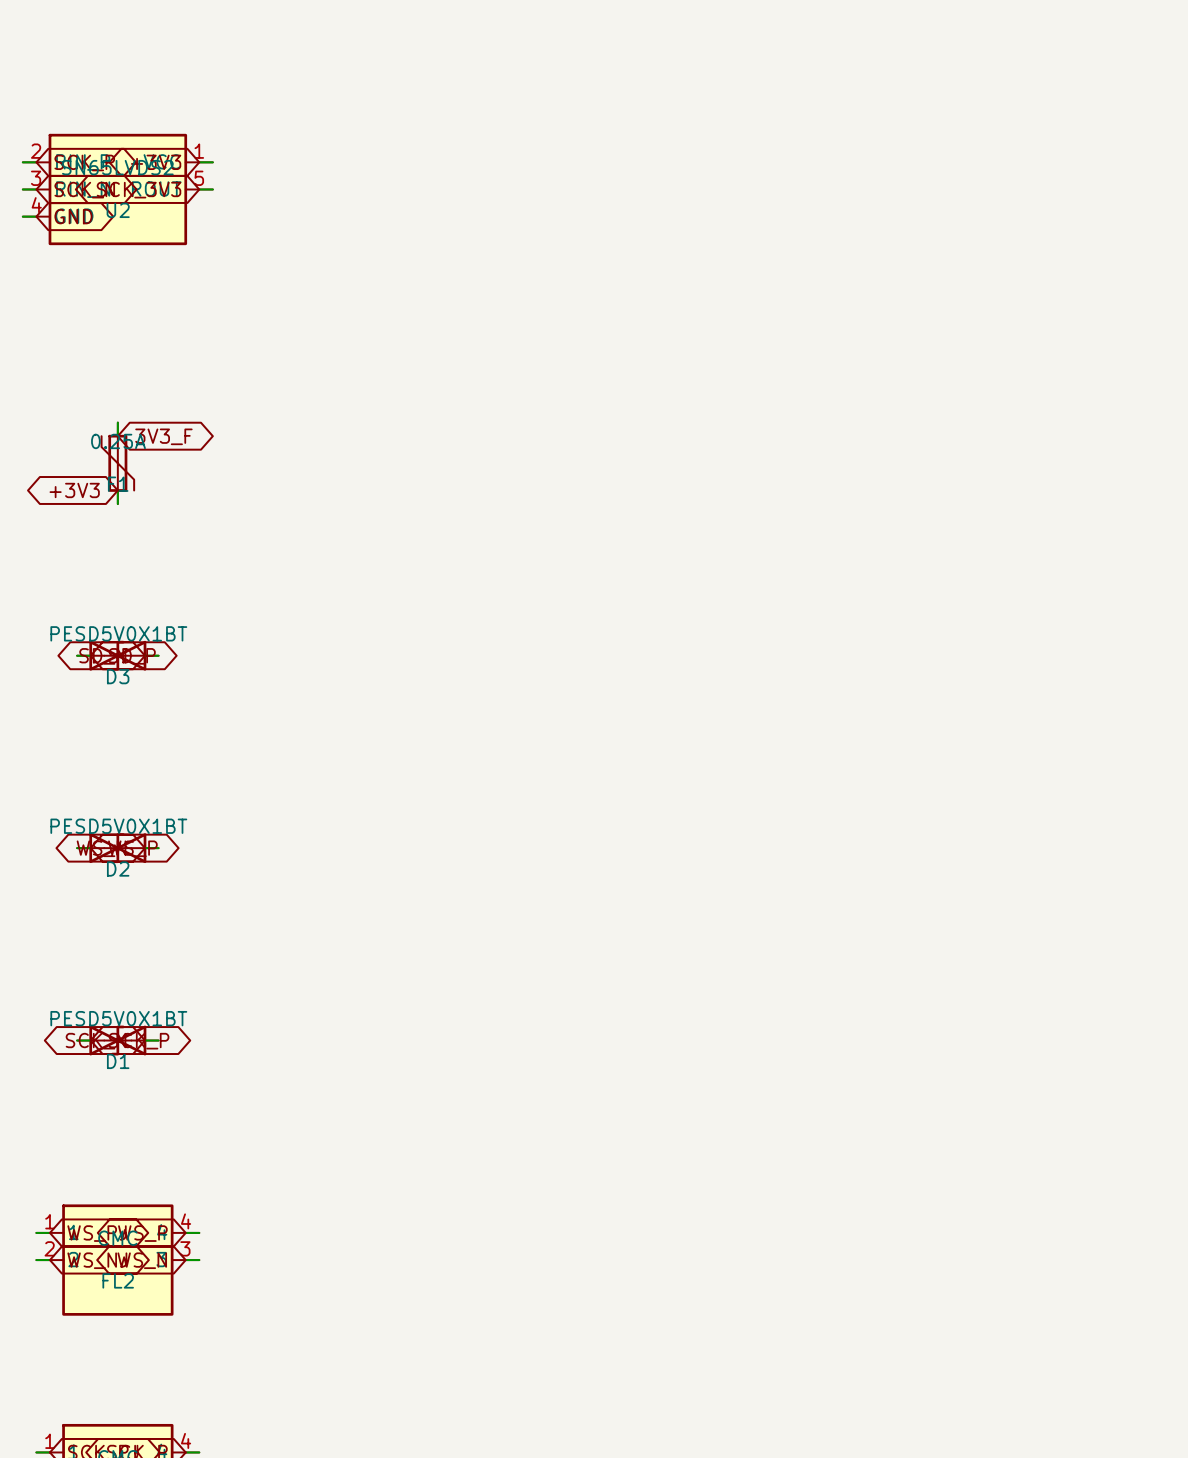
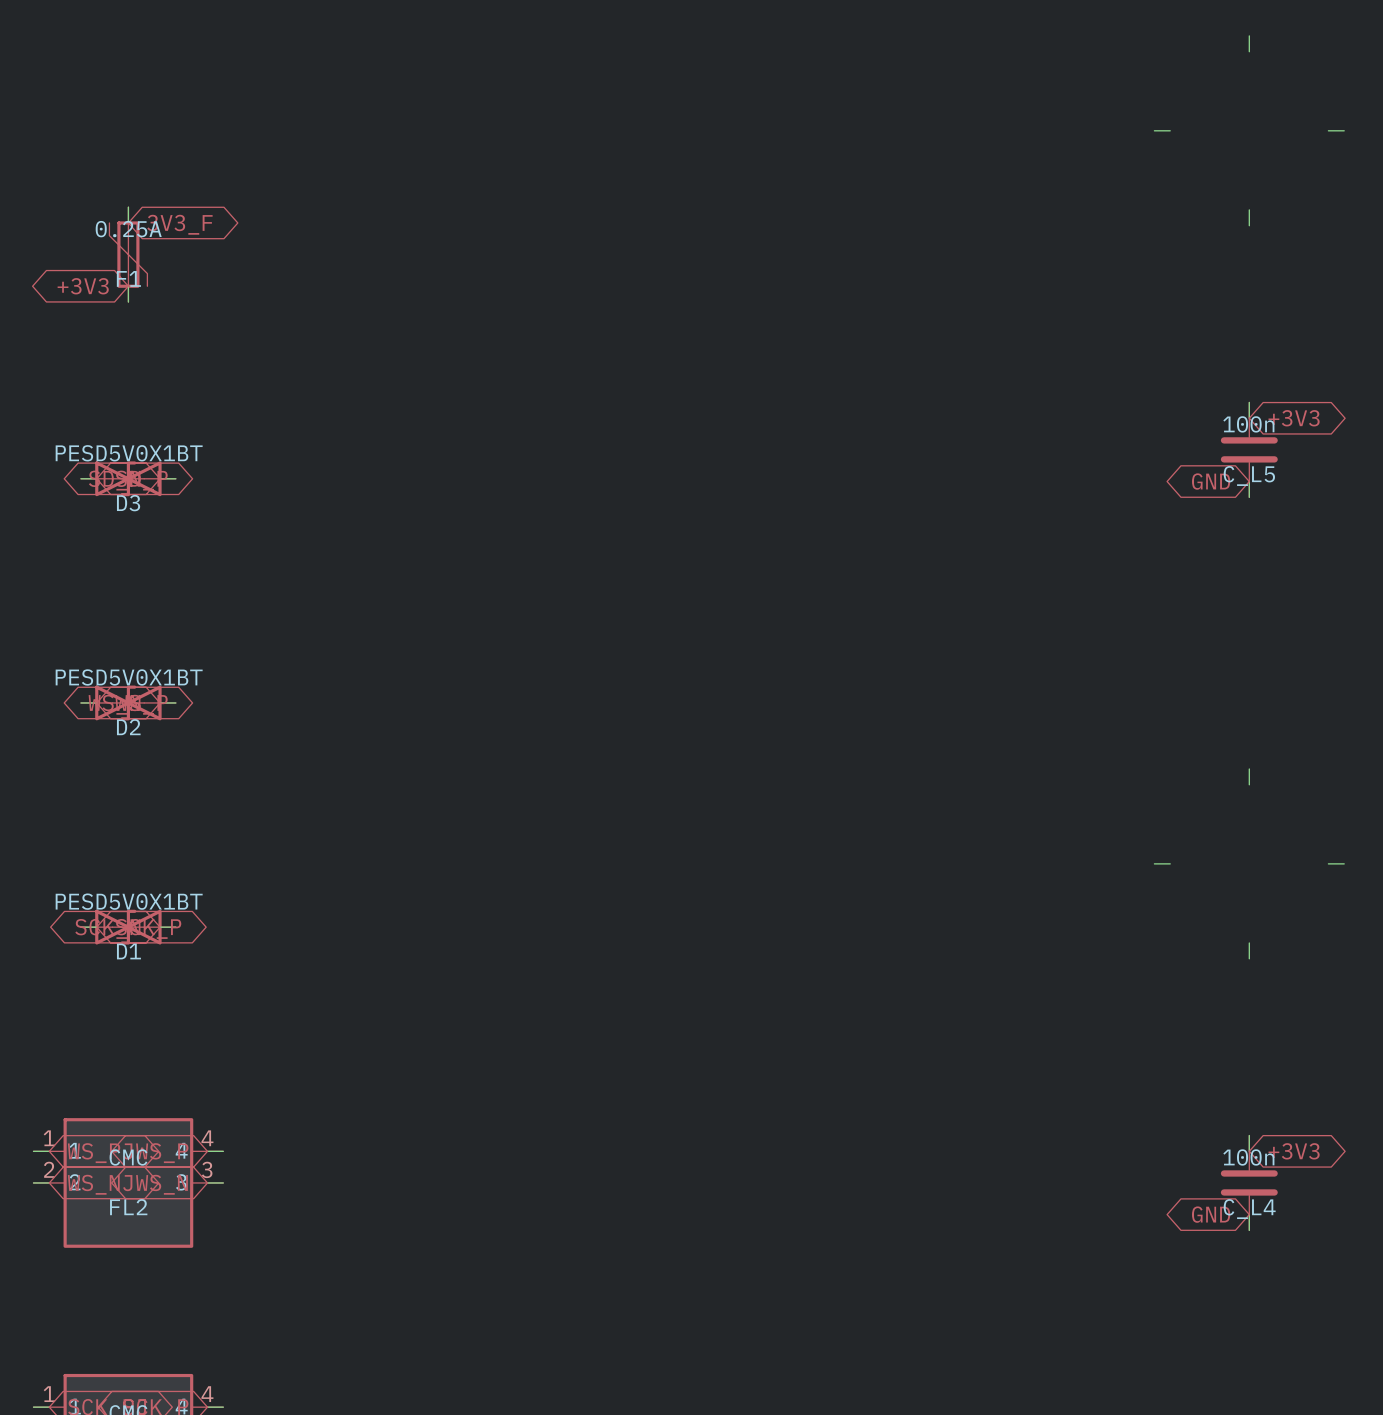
wire: none -> (1249, 35) (1249, 51)
wire: none -> (1154, 130) (1170, 130)
wire: none -> (1328, 130) (1344, 130)
wire: none -> (1249, 209) (1249, 225)
wire: none -> (1249, 402) (1249, 418)
global label: none -> +3V3 (1294, 418)
C_L5: none -> 100n (1249, 449)
global label: none -> GND (1211, 481)
wire: none -> (1249, 481) (1249, 497)
wire: none -> (1249, 768) (1249, 784)
wire: none -> (1154, 863) (1170, 863)
wire: none -> (1328, 863) (1344, 863)
wire: none -> (1249, 942) (1249, 958)
wire: none -> (1249, 1135) (1249, 1151)
global label: none -> +3V3 (1294, 1151)
C_L4: none -> 100n (1249, 1182)
global label: none -> GND (1211, 1214)
wire: none -> (1249, 1214) (1249, 1230)

